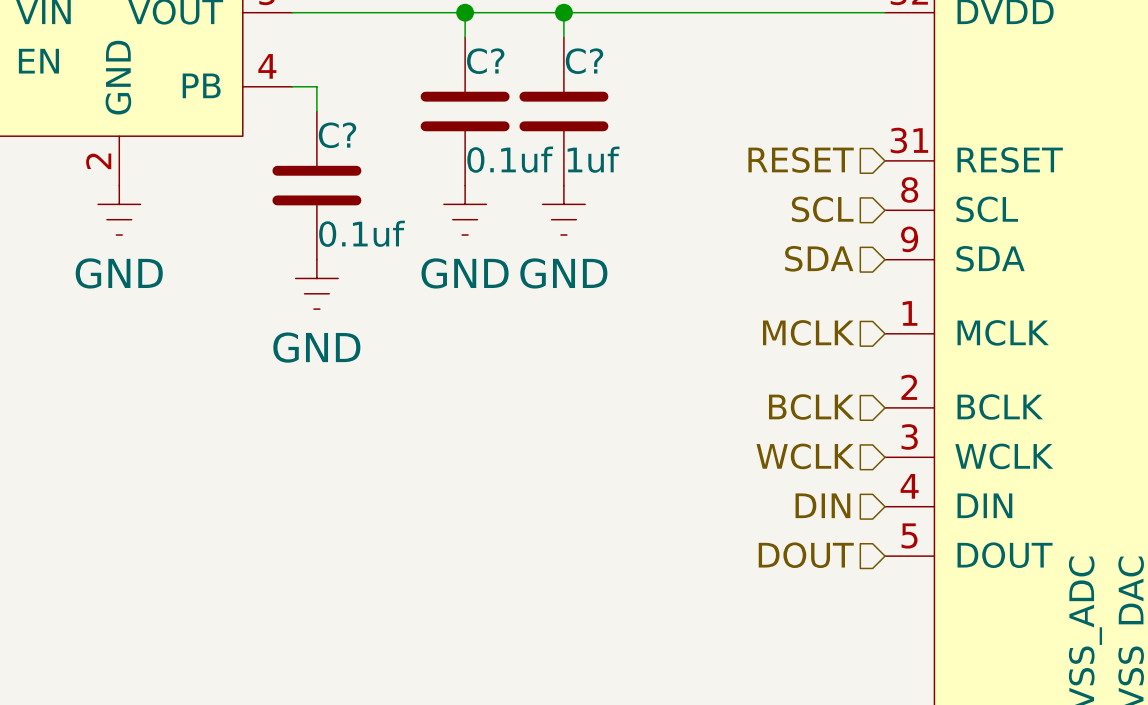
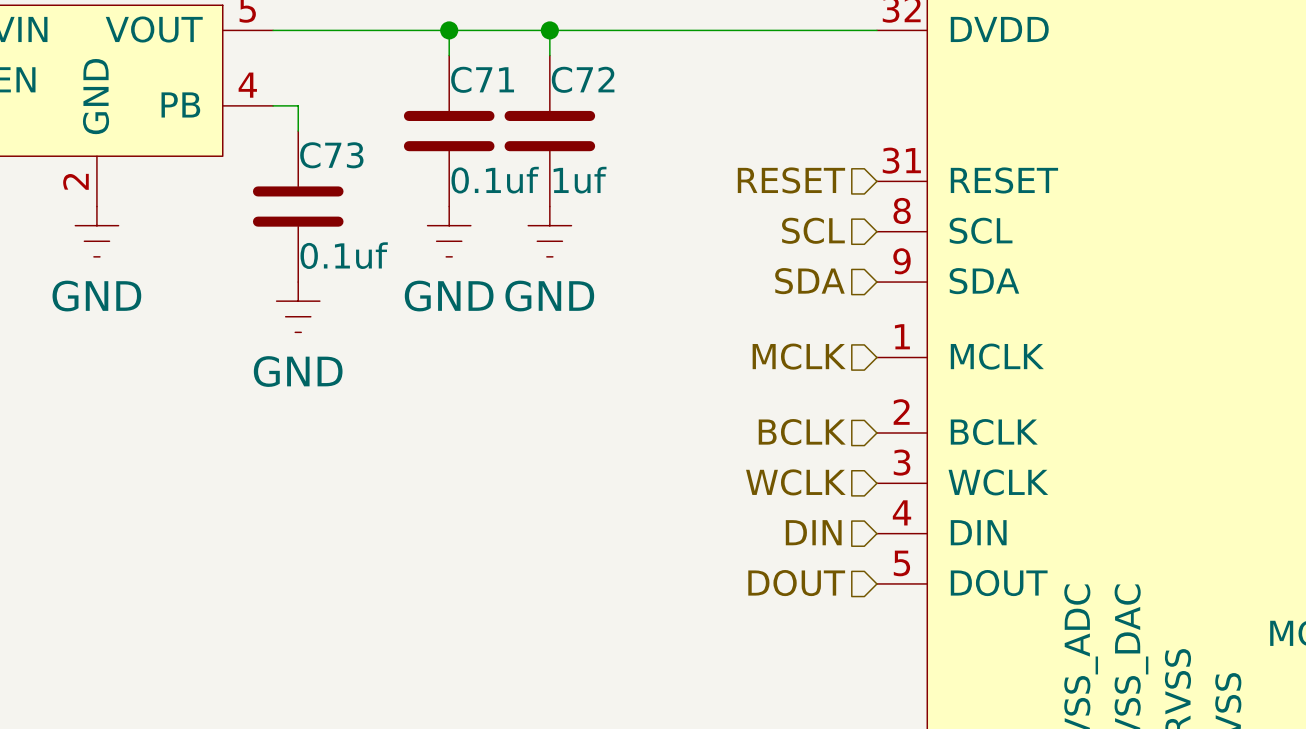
C? name: C? (485, 61) -> C71 (482, 79)
C? name: C? (584, 61) -> C72 (583, 79)
C? name: C? (337, 135) -> C73 (331, 155)

